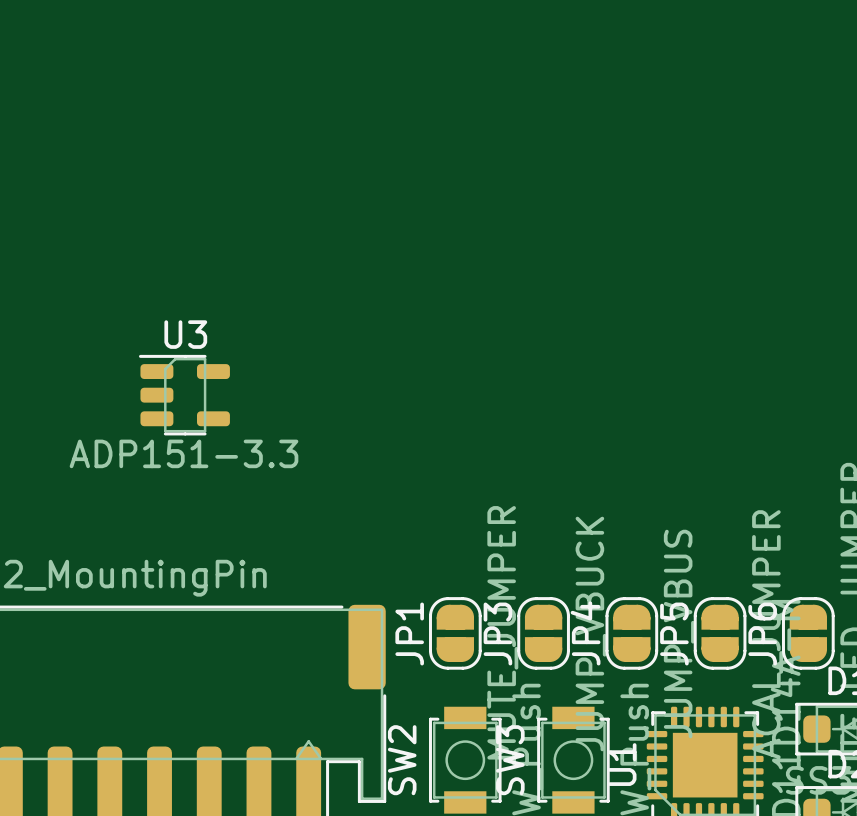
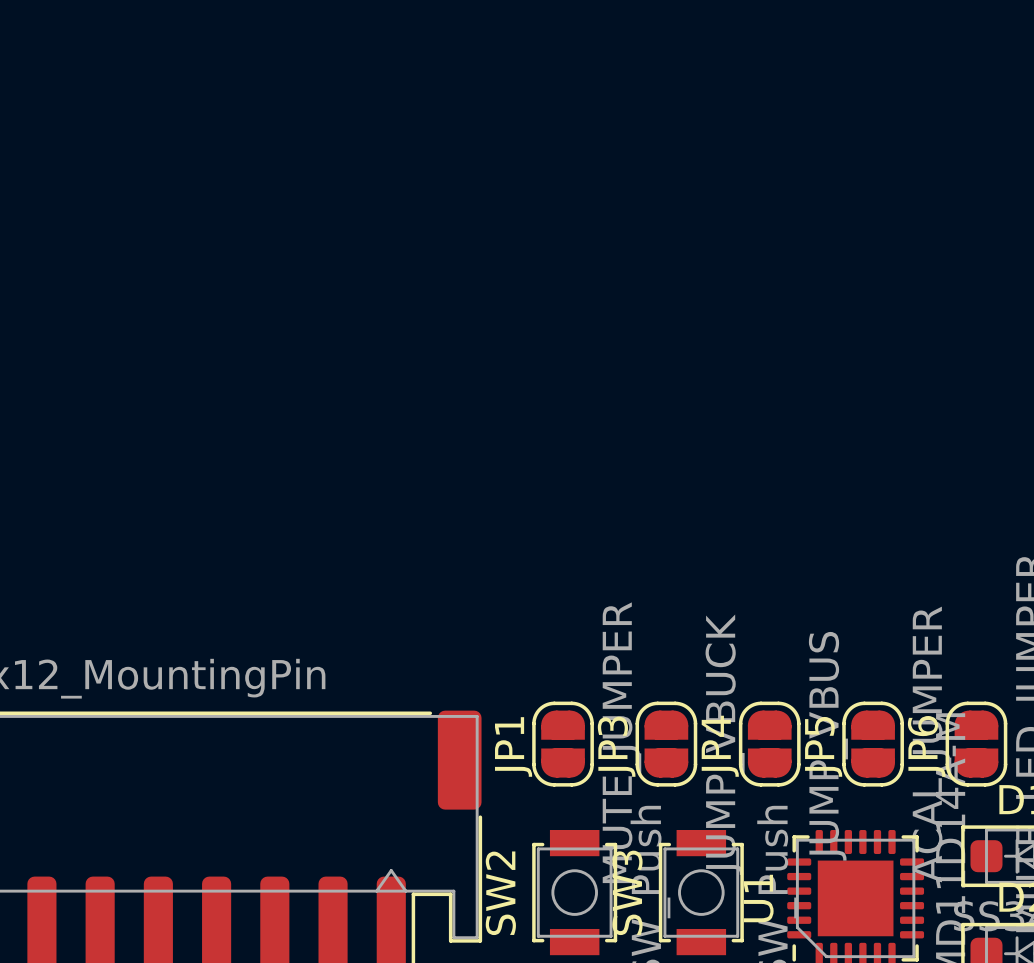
U3: ADP151-3.3 (184, 395) -> none

